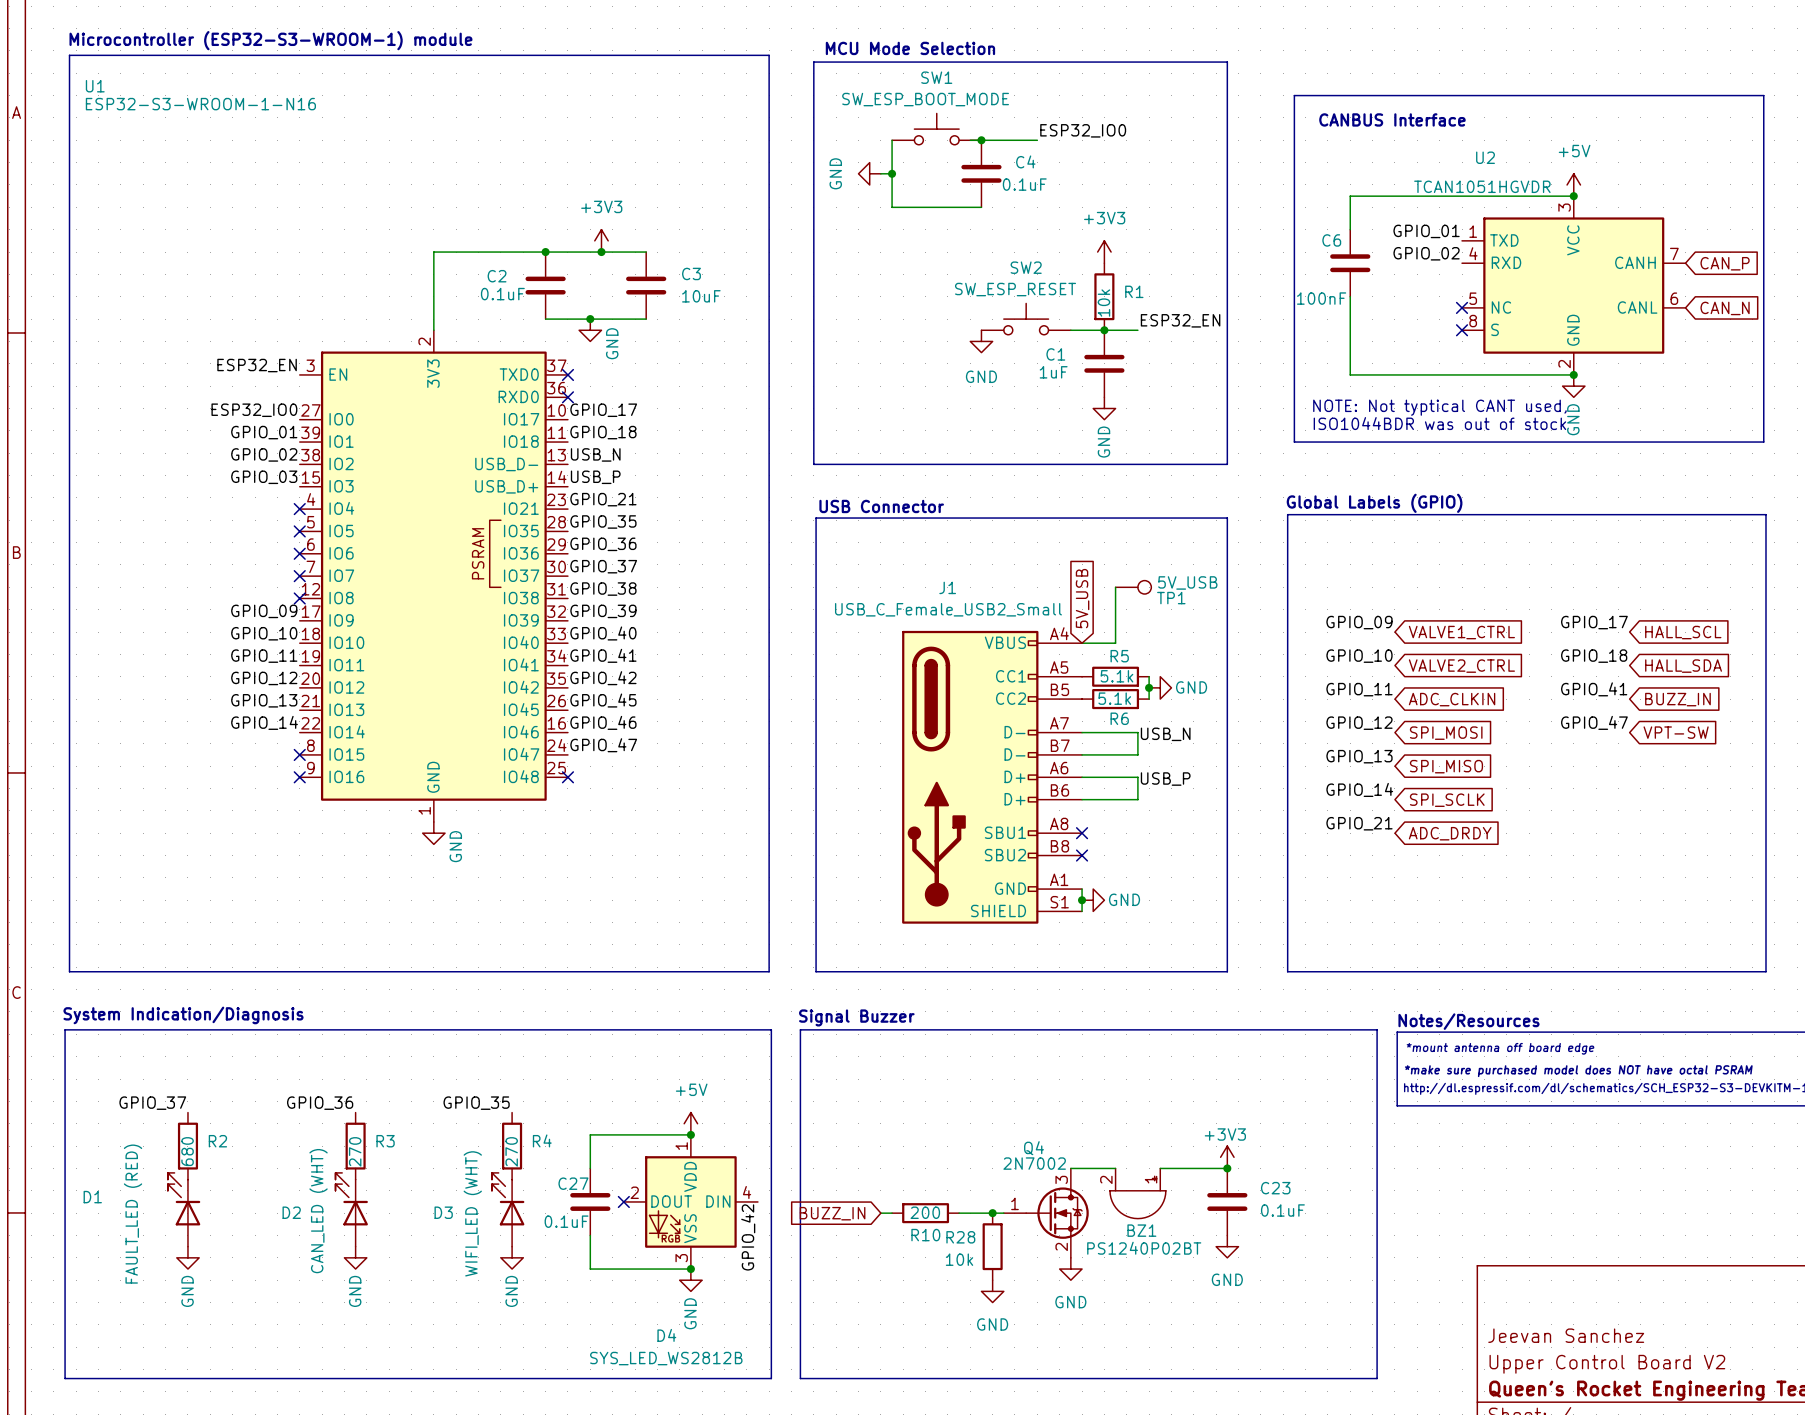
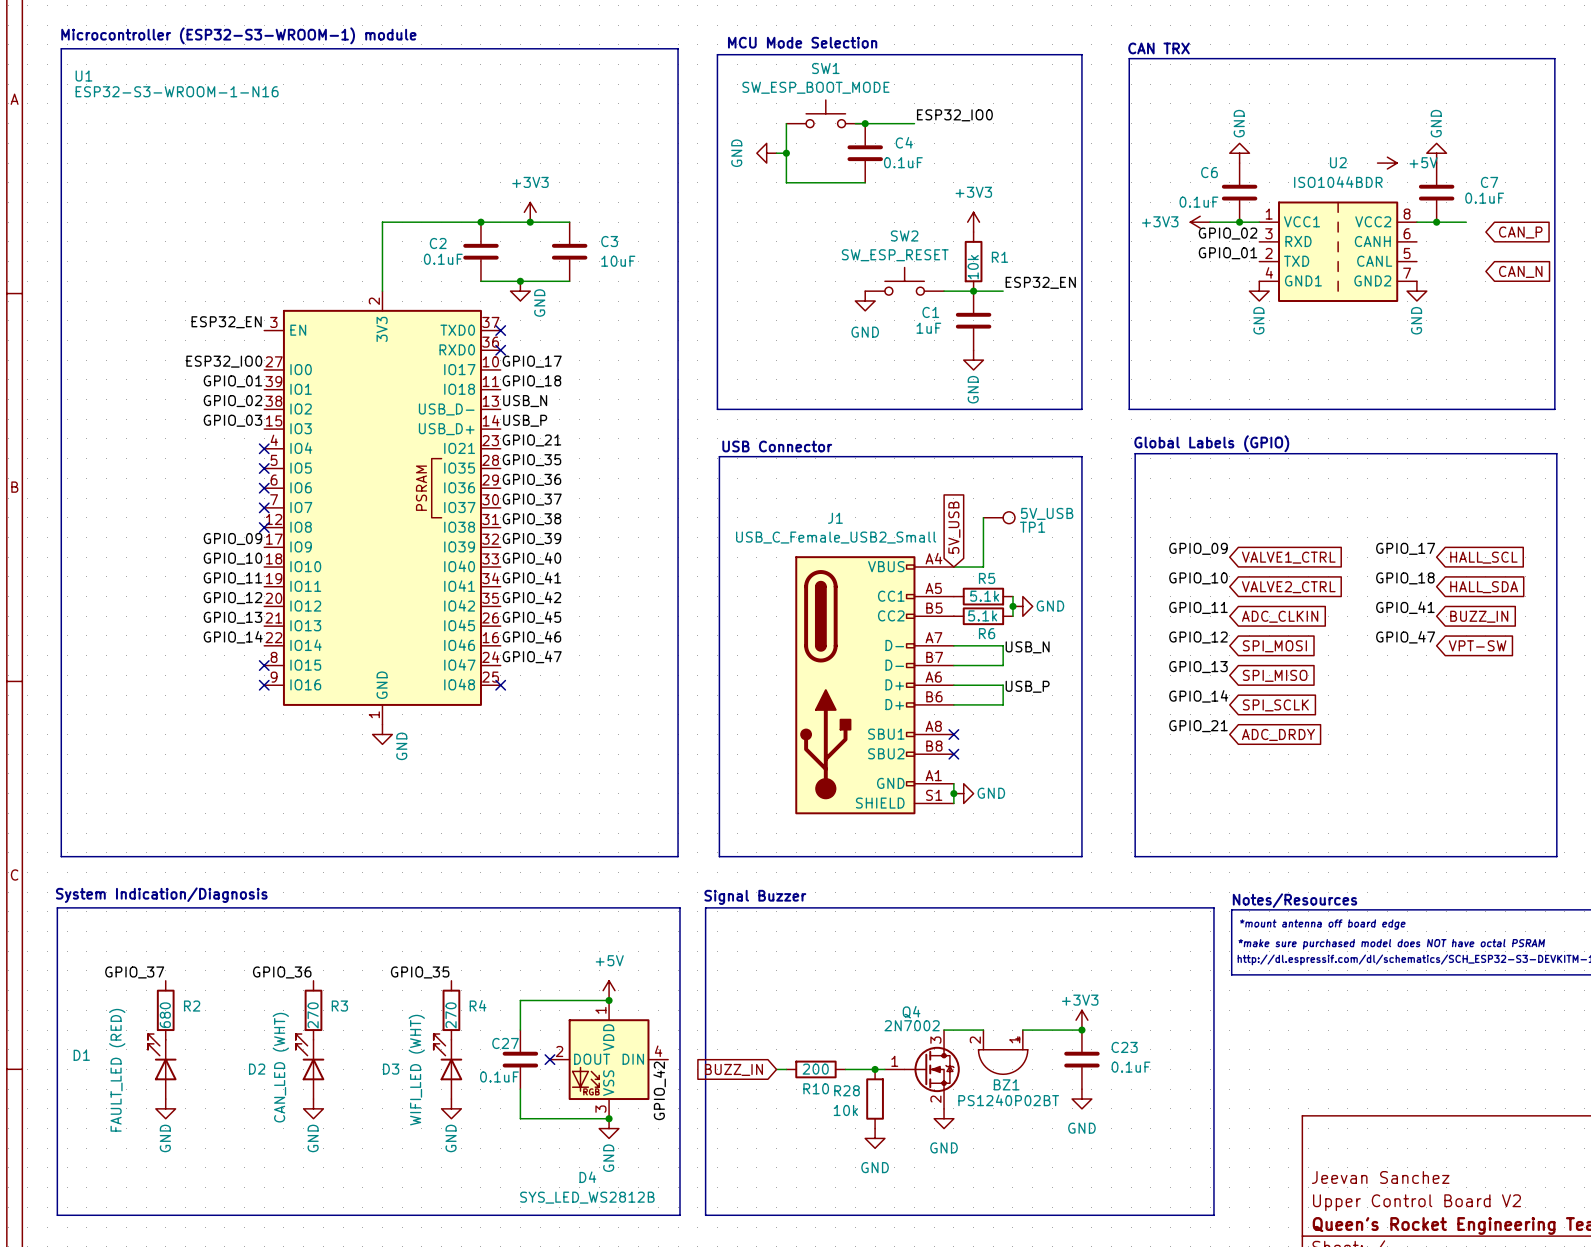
text: none -> CAN TRX (1159, 48)
line: (1763, 95) (1294, 95) (1294, 442) (1763, 442) -> (1554, 84) (1554, 58) (1129, 58) (1129, 409) (1554, 409) (1554, 389)
text: CANBUS Interface (1392, 119) -> none
U2 name position: U2 (1485, 157) -> U2 (1338, 162)
power symbol: none -> GND (1239, 153)
power symbol: none -> GND (1436, 153)
power symbol rotation: 0° (1573, 184) -> 90° clockwise (1387, 163)
U2 value: TCAN1051HGVDR (1482, 186) -> ISO1044BDR (1338, 182)
U2 symbol: [1462, 196, 1686, 375] -> [1259, 201, 1417, 302]
wire: (1573, 196) (1350, 196) (1350, 229) -> none
junction: (1573, 196) -> none
C7: none -> 0.1uF (1436, 192)
label position: GPIO_01 (1426, 231) -> GPIO_01 (1228, 253)
C6 name position: C6 (1331, 240) -> C6 (1209, 172)
power symbol: none -> +3V3 (1200, 222)
wire: none -> (1210, 222) (1259, 222)
junction: none -> (1239, 222)
junction: none -> (1436, 222)
label position: GPIO_02 (1426, 253) -> GPIO_02 (1228, 233)
C6 position: (1350, 263) -> (1239, 192)
wire: (1350, 296) (1350, 374) (1573, 374) -> none
C6 value: 100nF (1321, 298) -> 0.1uF (1198, 202)
no-connect mark: (1462, 307) -> none
power symbol: none -> GND (1259, 291)
no-connect mark: (1462, 330) -> none
junction: (1573, 374) -> none
power symbol position: GND (1573, 386) -> GND (1416, 291)
text: NOTE: Not typtical CANT used, (1439, 407) -> none
text: ISO1044BDR was out of stock (1439, 423) -> none

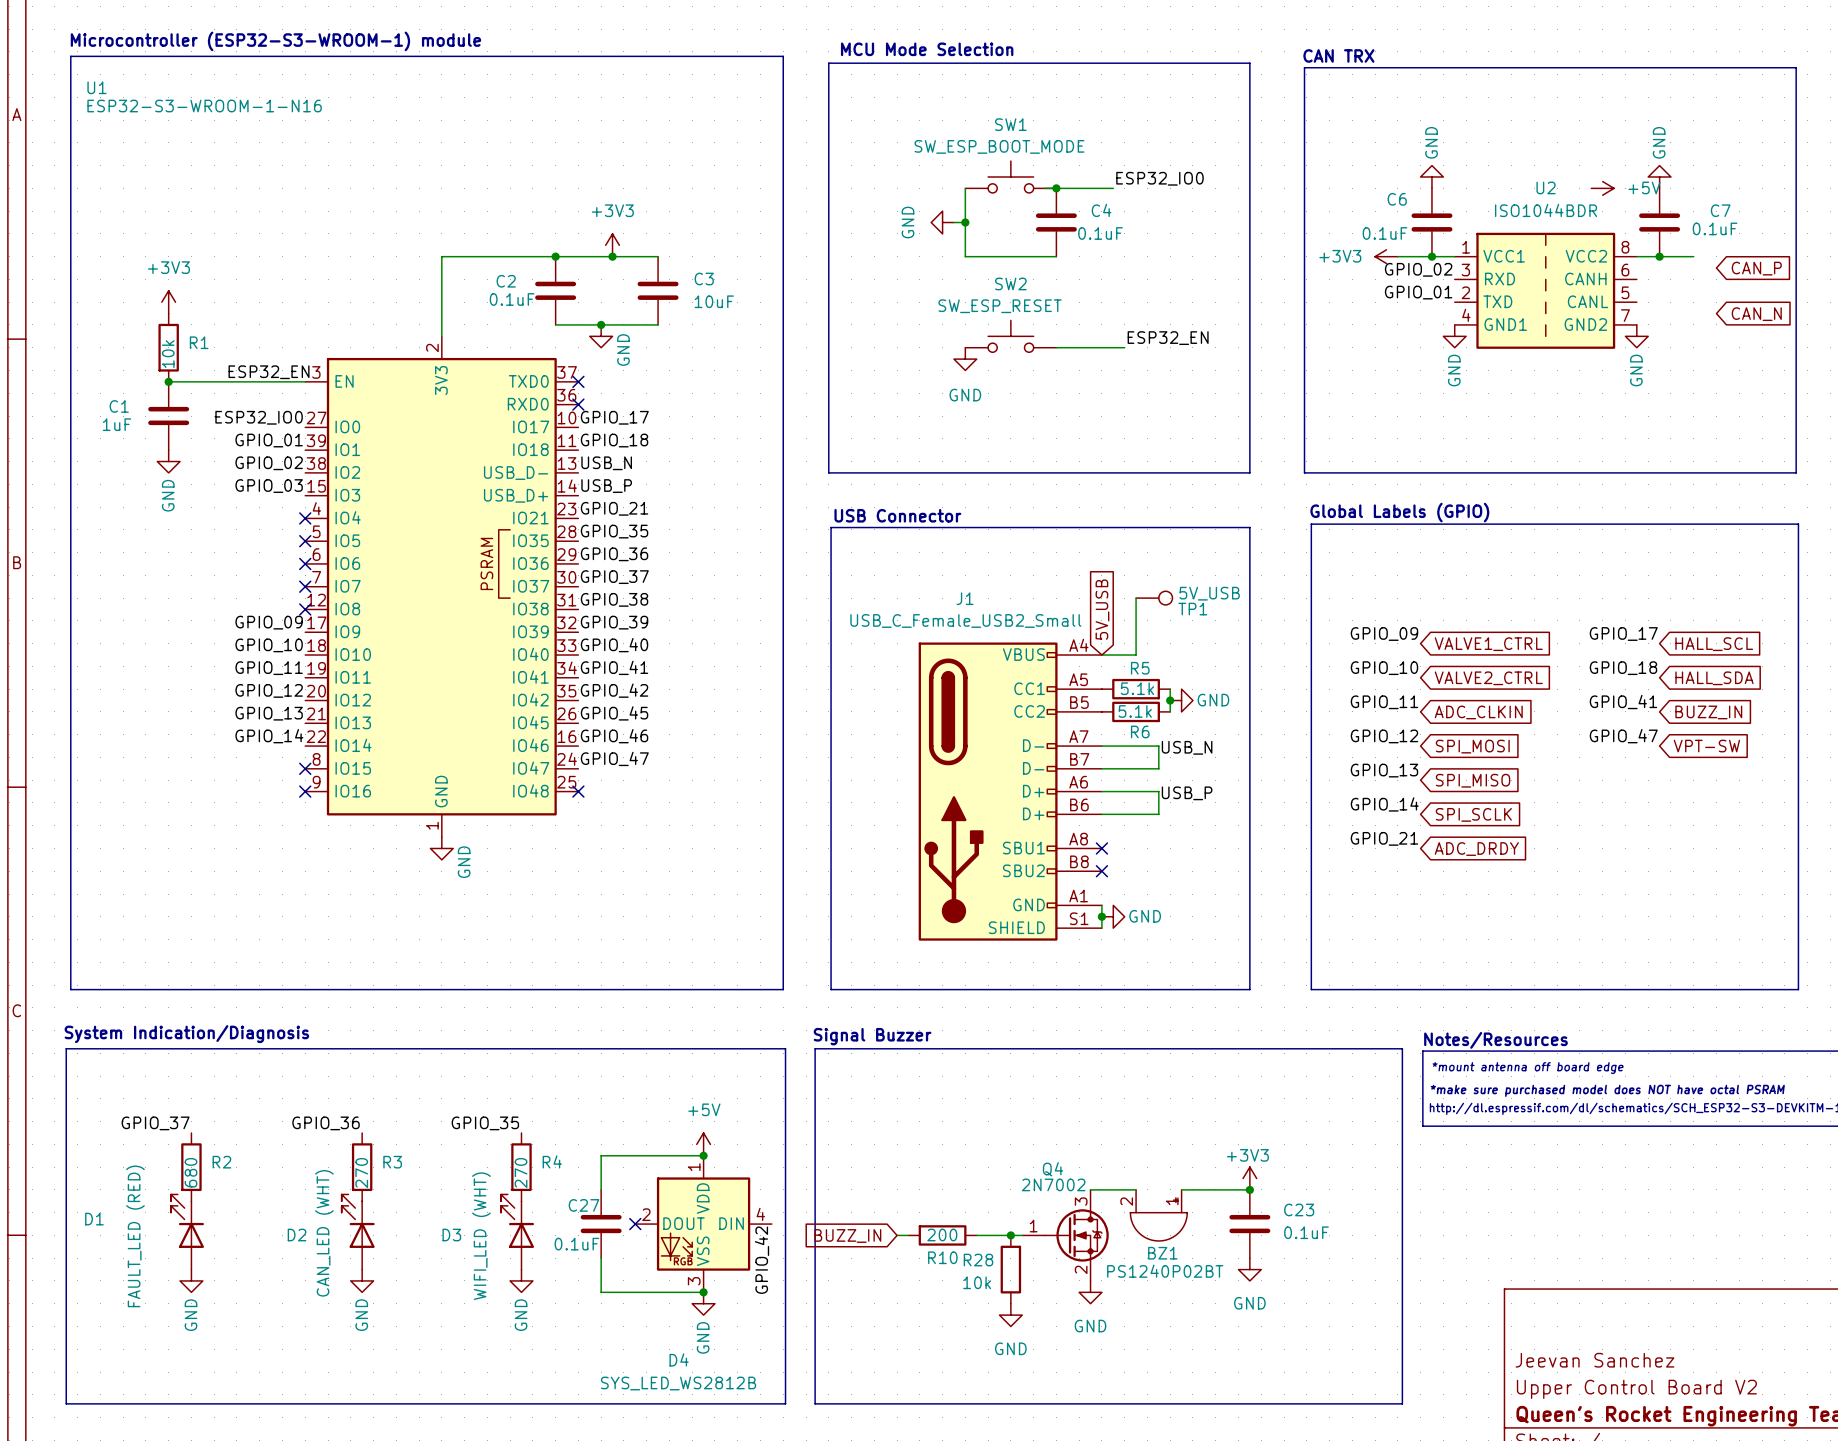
SW1 position: (825, 113) -> (1010, 177)
label position: ESP32_IO0 (954, 115) -> ESP32_IO0 (1159, 178)
wire: (786, 123) (786, 182) (865, 182) -> (965, 188) (965, 256) (1056, 256)
wire: (855, 123) (914, 123) -> (1045, 188) (1113, 188)
junction: (865, 123) -> none
power symbol: GND (766, 153) -> none
wire: (776, 153) (786, 153) -> (953, 222) (965, 222)
junction: (786, 153) -> none
C4 position: (865, 153) -> (1056, 222)
junction: none -> (1056, 188)
power symbol: none -> GND (942, 222)
junction: none -> (965, 222)
power symbol: +3V3 (973, 222) -> none
power symbol: none -> +3V3 (168, 302)
R1 position: (973, 261) -> (168, 347)
SW2 position: (904, 281) -> (1010, 336)
label position: ESP32_EN (1040, 282) -> ESP32_EN (1168, 338)
wire: (944, 291) (1003, 291) -> (1056, 347) (1124, 347)
junction: (973, 291) -> none
power symbol position: GND (865, 301) -> GND (965, 359)
C1 position: (973, 320) -> (168, 416)
label position: ESP32_EN (226, 322) -> ESP32_EN (269, 372)
wire: none -> (168, 381) (305, 381)
junction: none -> (168, 381)
power symbol: GND (973, 360) -> none
power symbol: none -> GND (168, 461)

